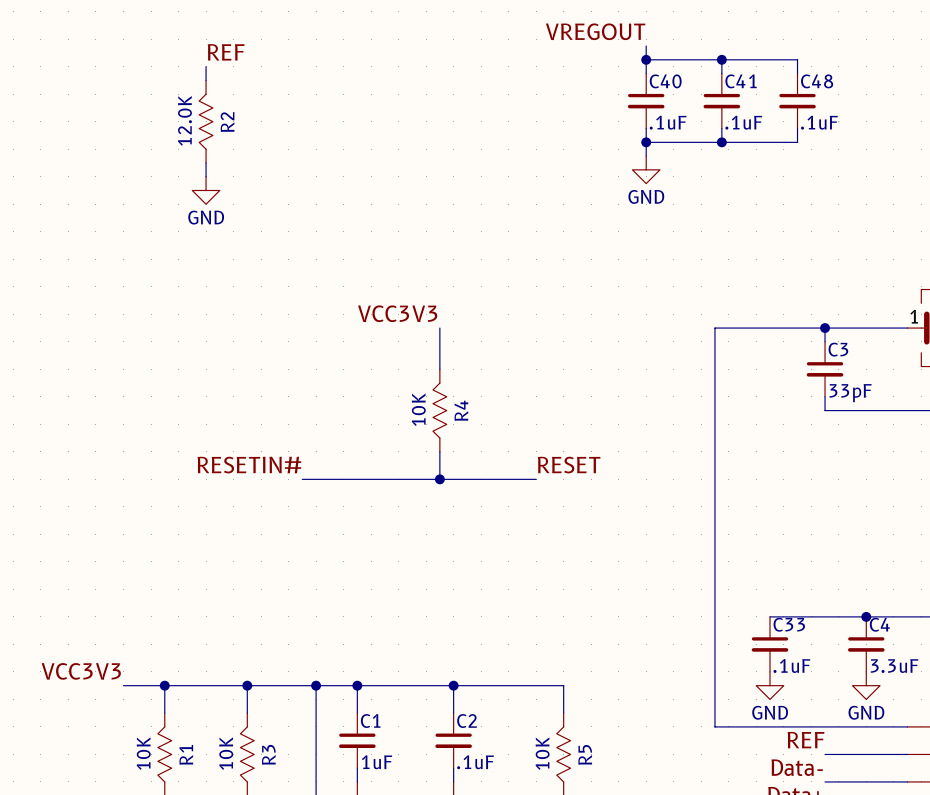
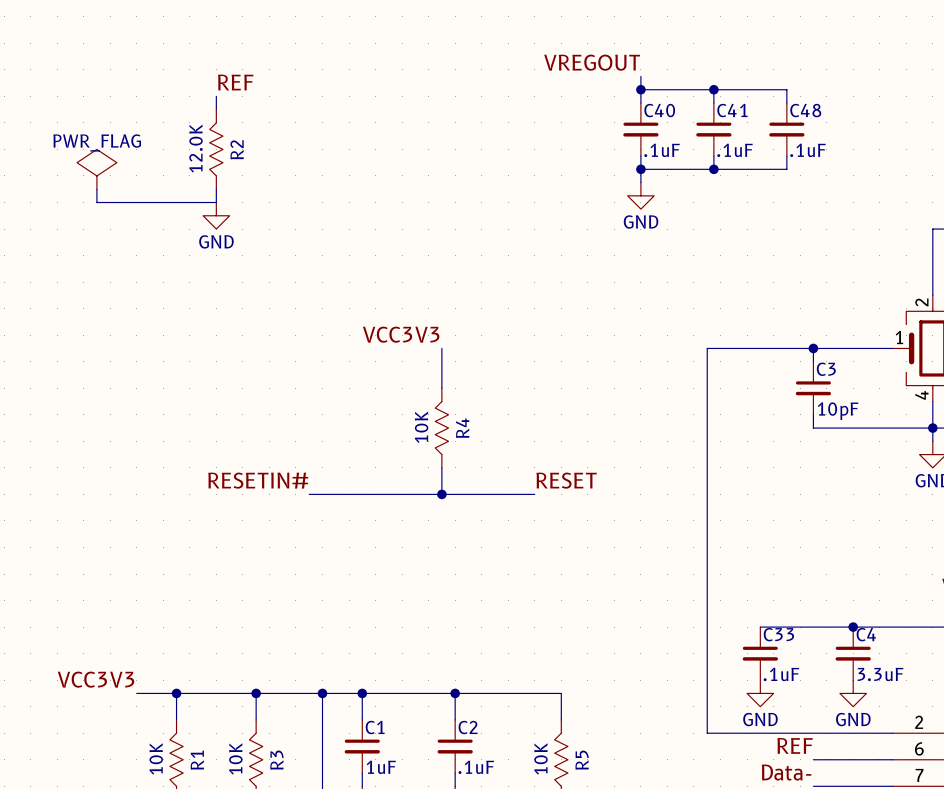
power symbol: none -> PWR_FLAG (96, 169)
wire: none -> (96, 189) (96, 202) (216, 202)
C3 value: 33pF (850, 393) -> 10pF (838, 411)

